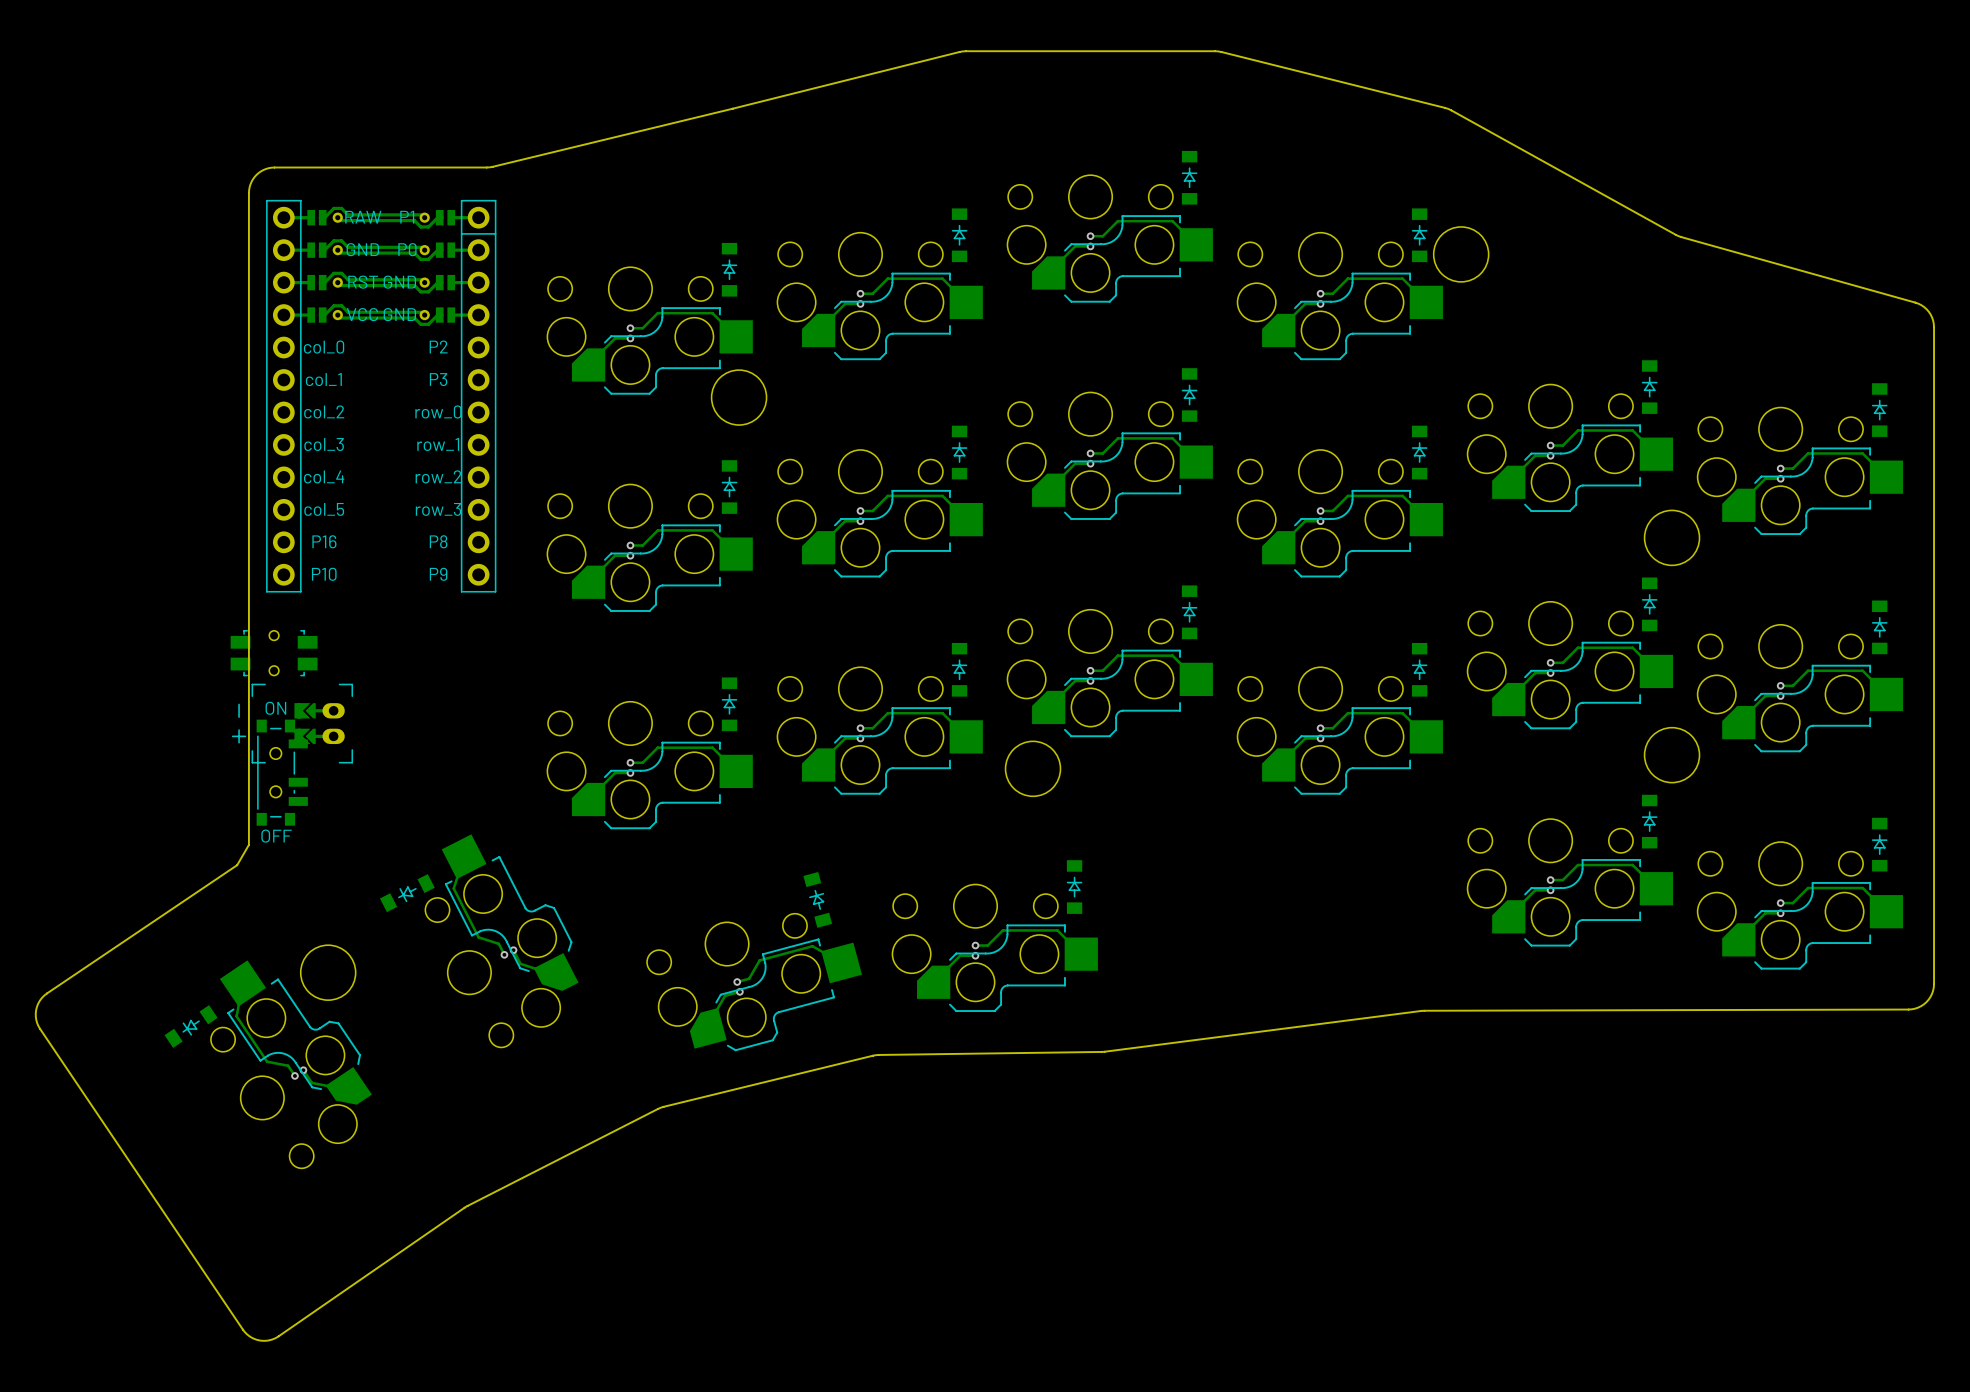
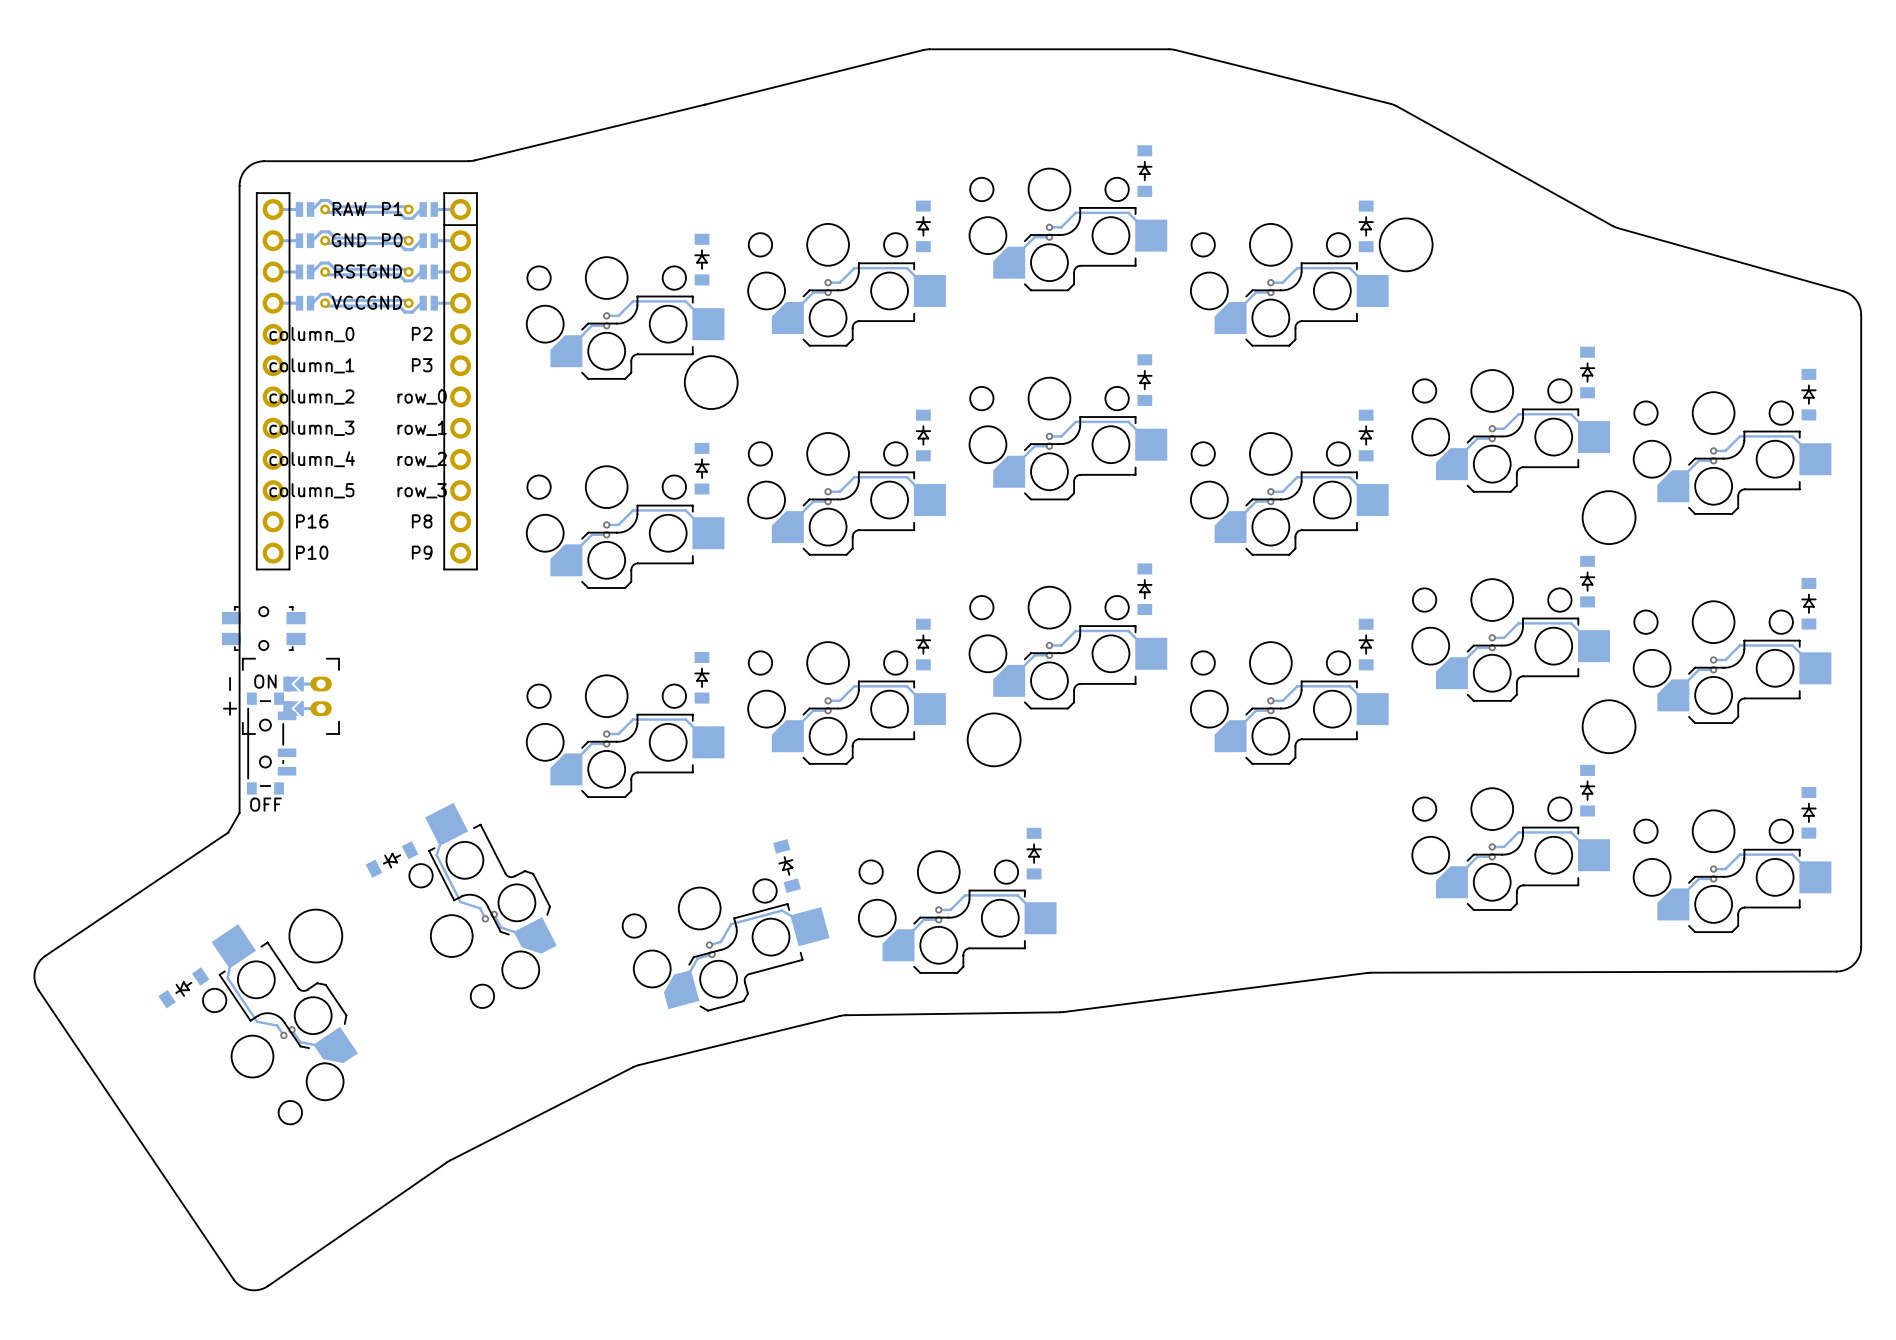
part text: col_0 (324, 347) -> column_0 (311, 334)
part text: col_1 (323, 379) -> column_1 (311, 365)
part text: col_2 (324, 411) -> column_2 (311, 397)
part text: col_3 (324, 444) -> column_3 (311, 428)
part text: col_4 (324, 476) -> column_4 (312, 459)
part text: col_5 (324, 509) -> column_5 (311, 490)

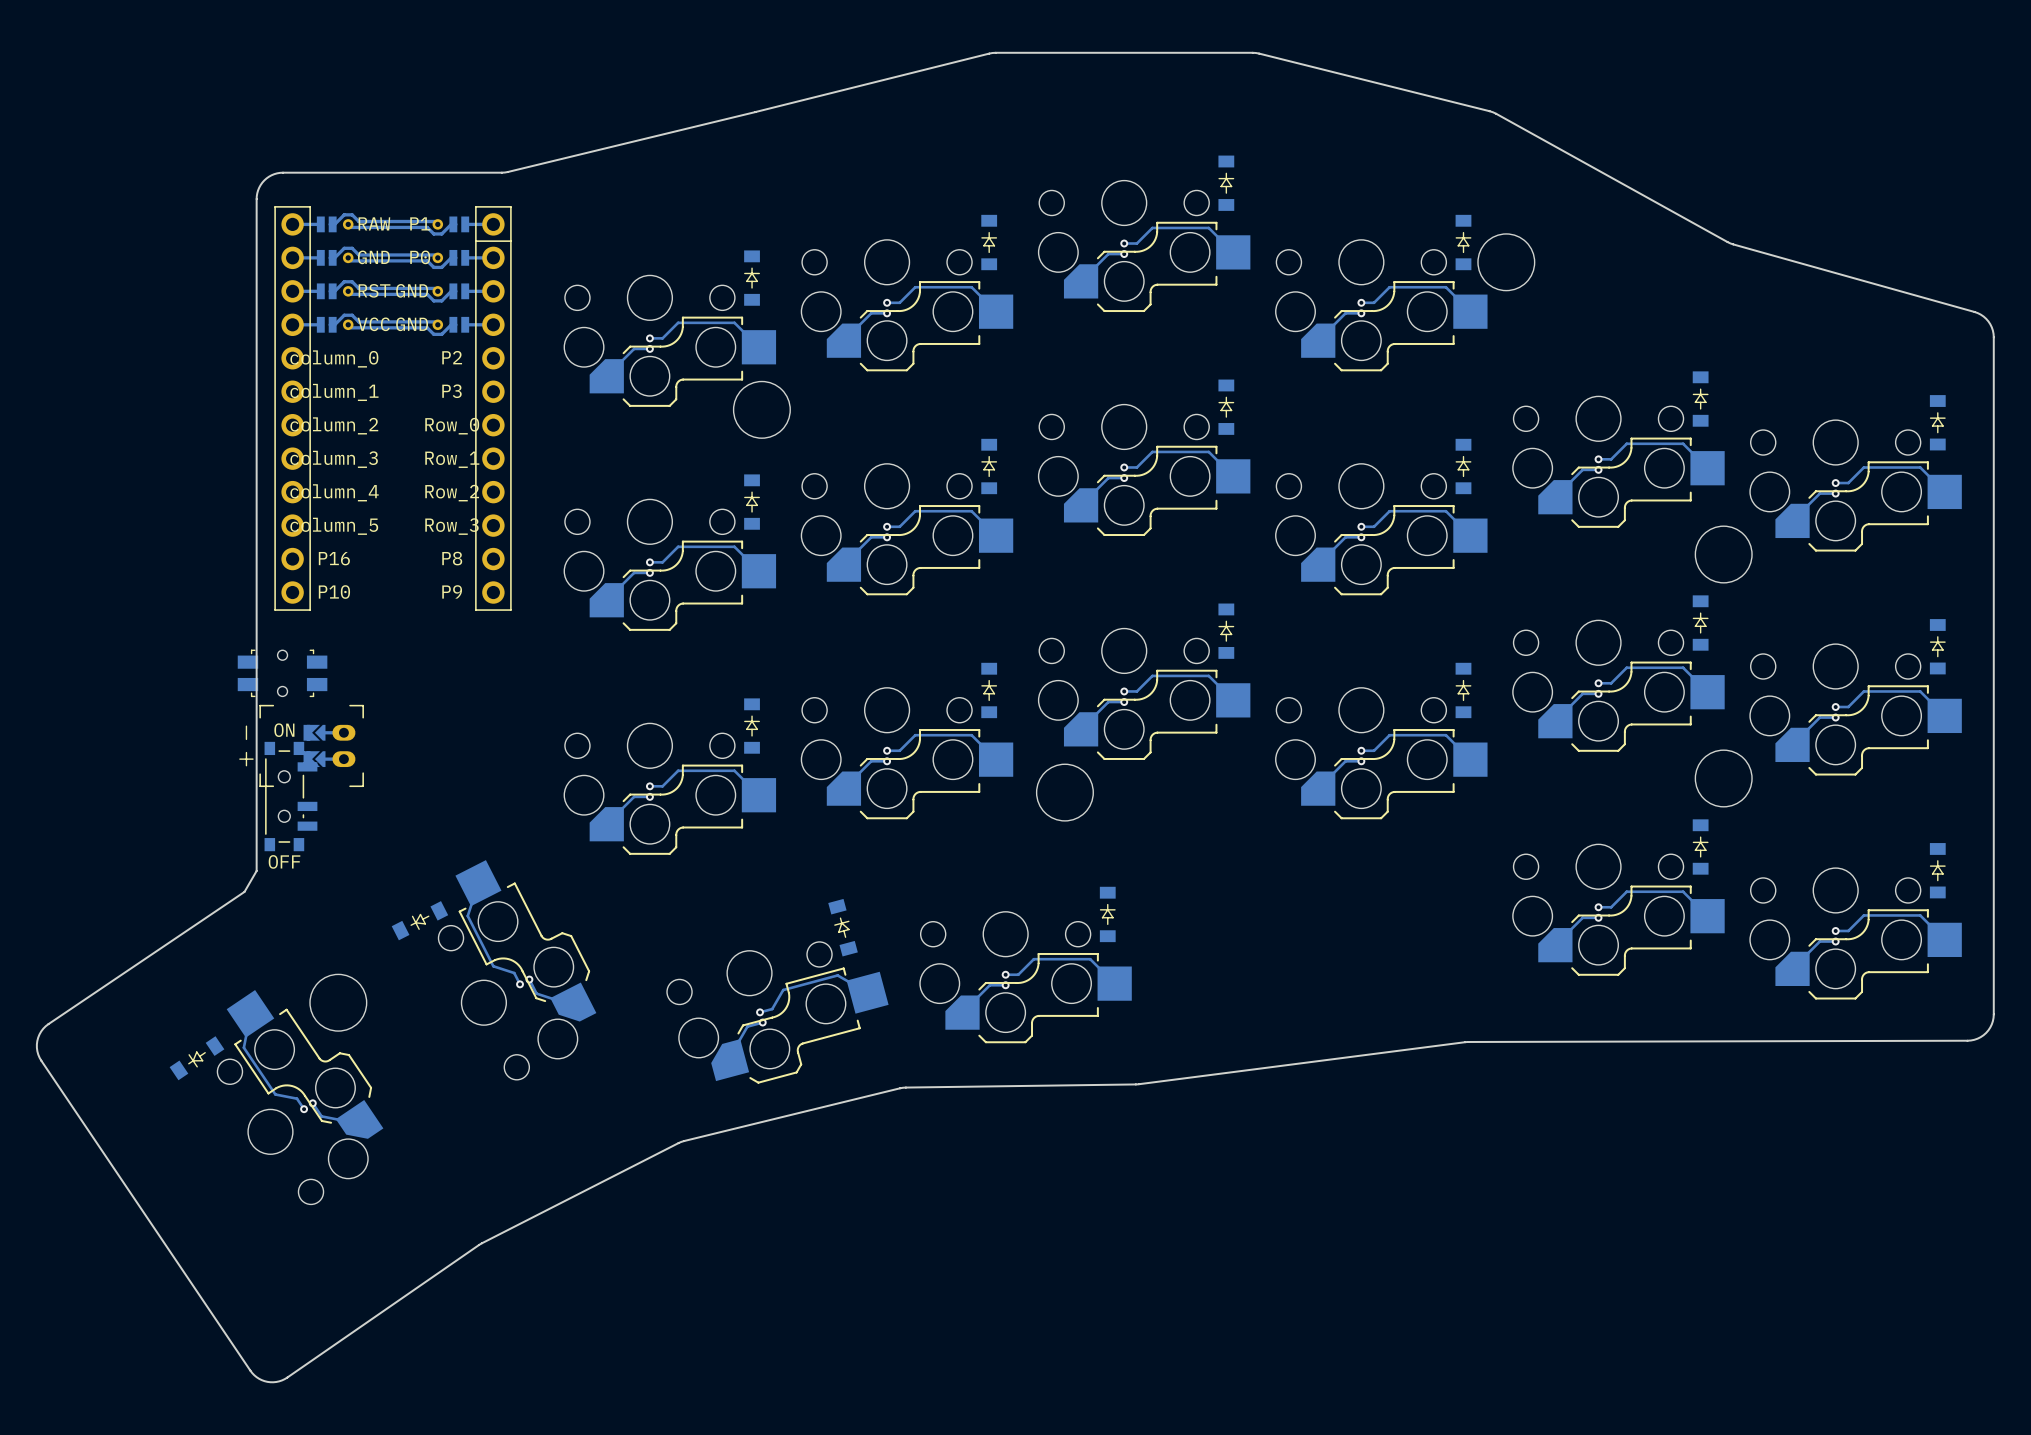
part text: row_0 (422, 397) -> Row_0 (452, 426)
part text: row_1 (422, 428) -> Row_1 (452, 459)
part text: row_2 (422, 459) -> Row_2 (452, 493)
part text: row_3 (422, 490) -> Row_3 (451, 526)

